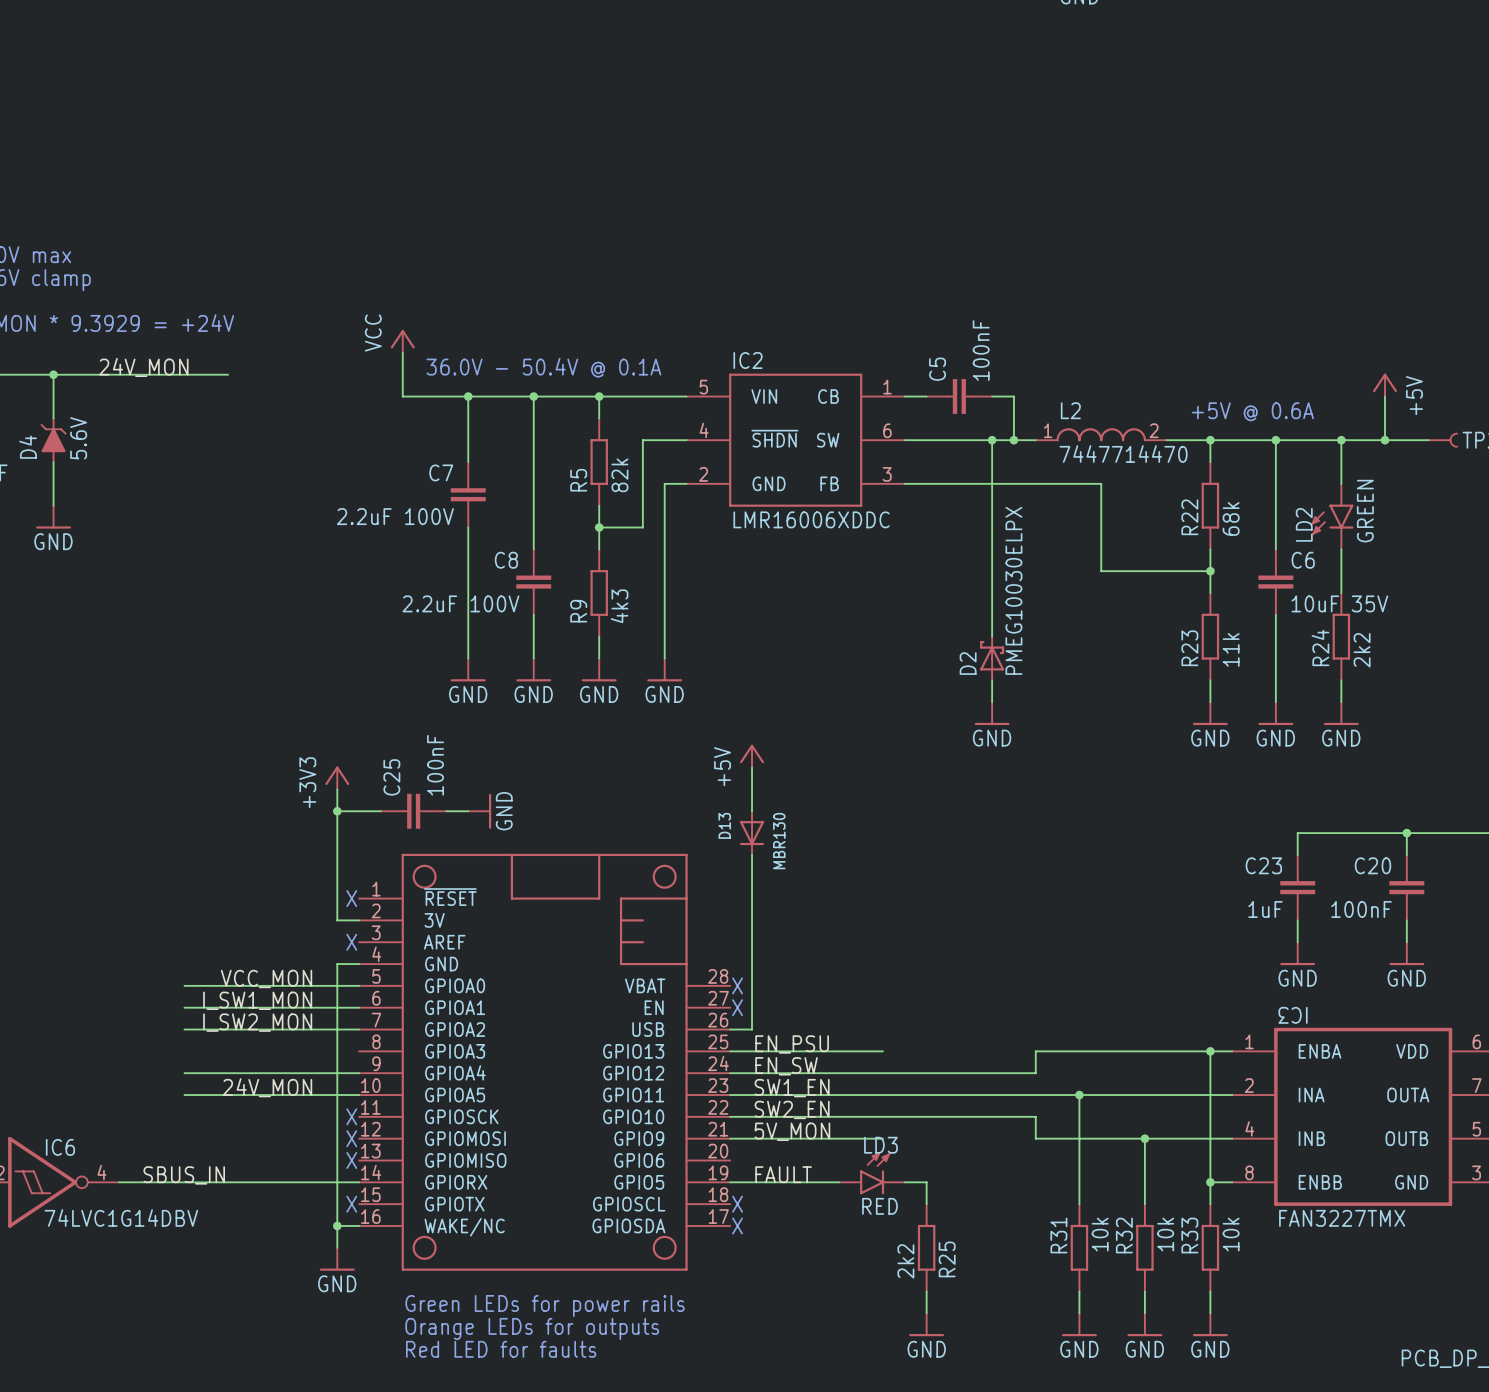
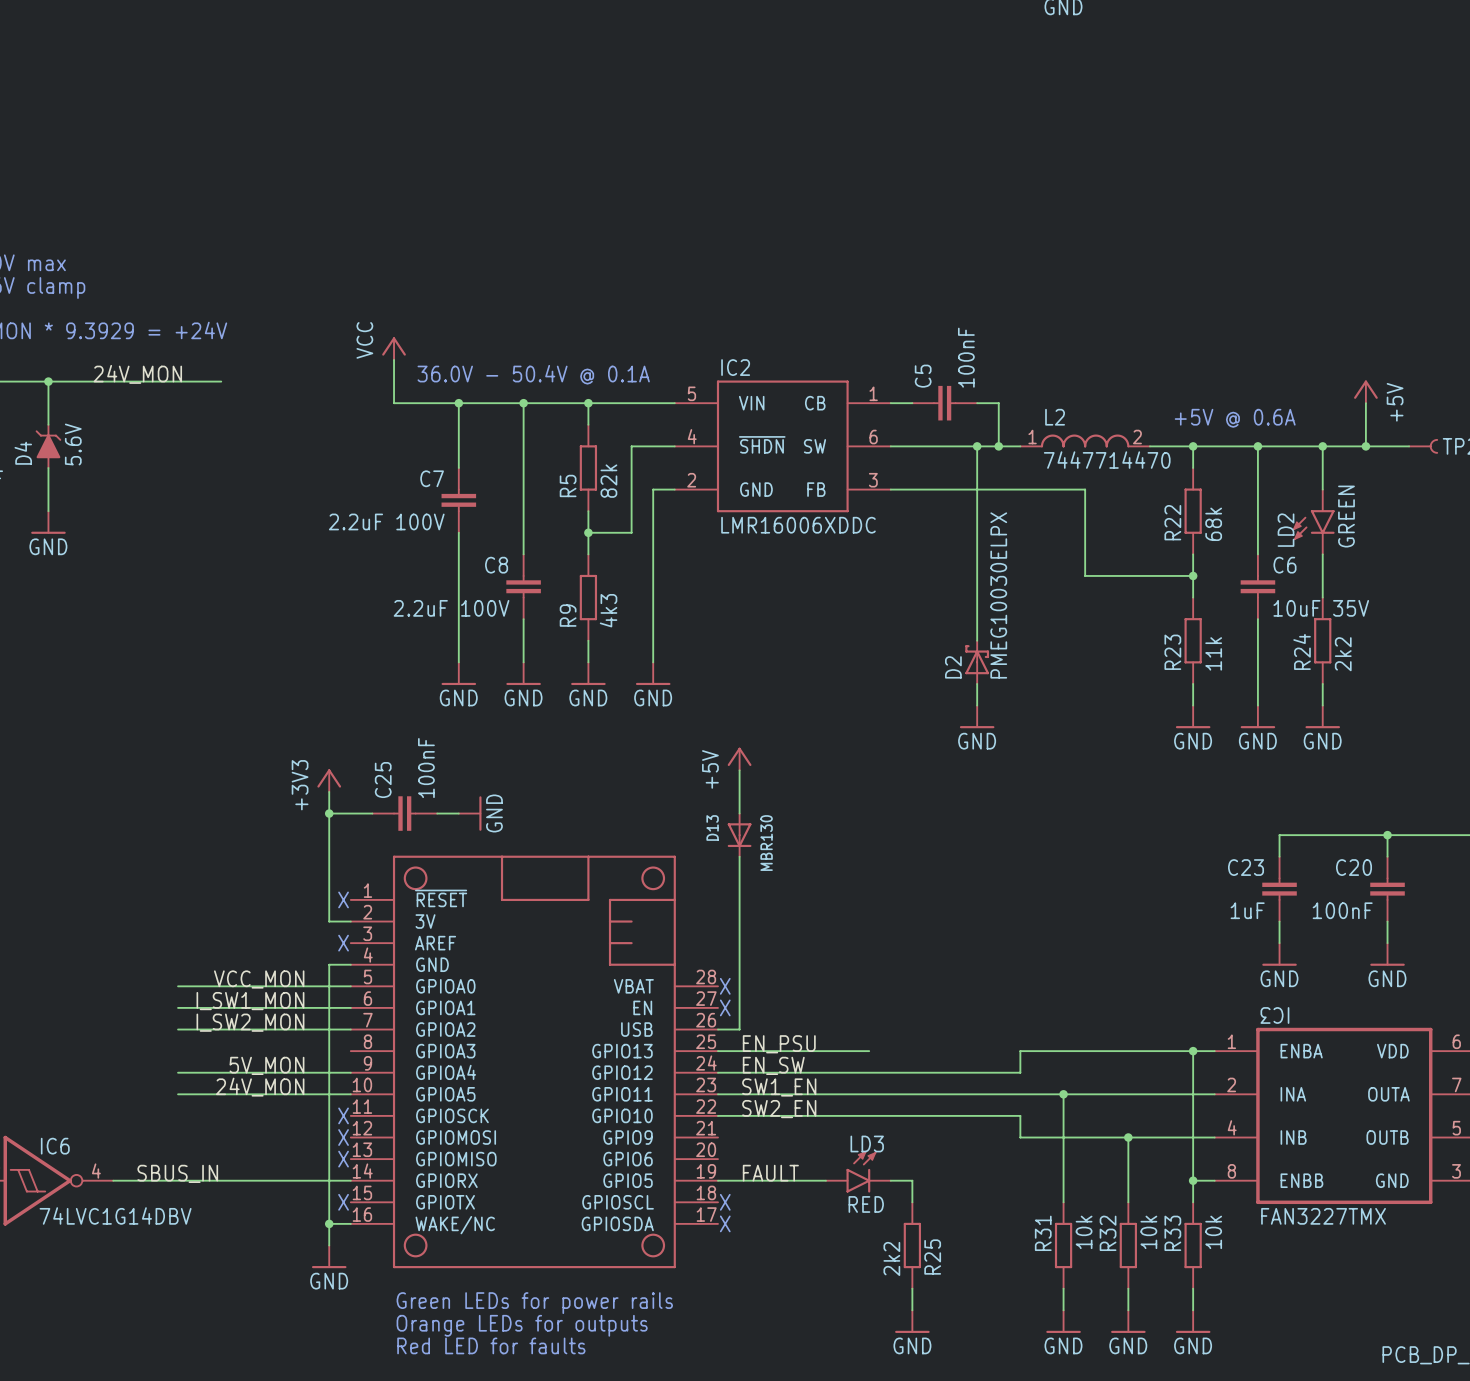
label: none -> 5V_MON (266, 1065)
label: 5V_MON (792, 1131) -> none
wire: (730, 1138) (882, 1138) -> none

